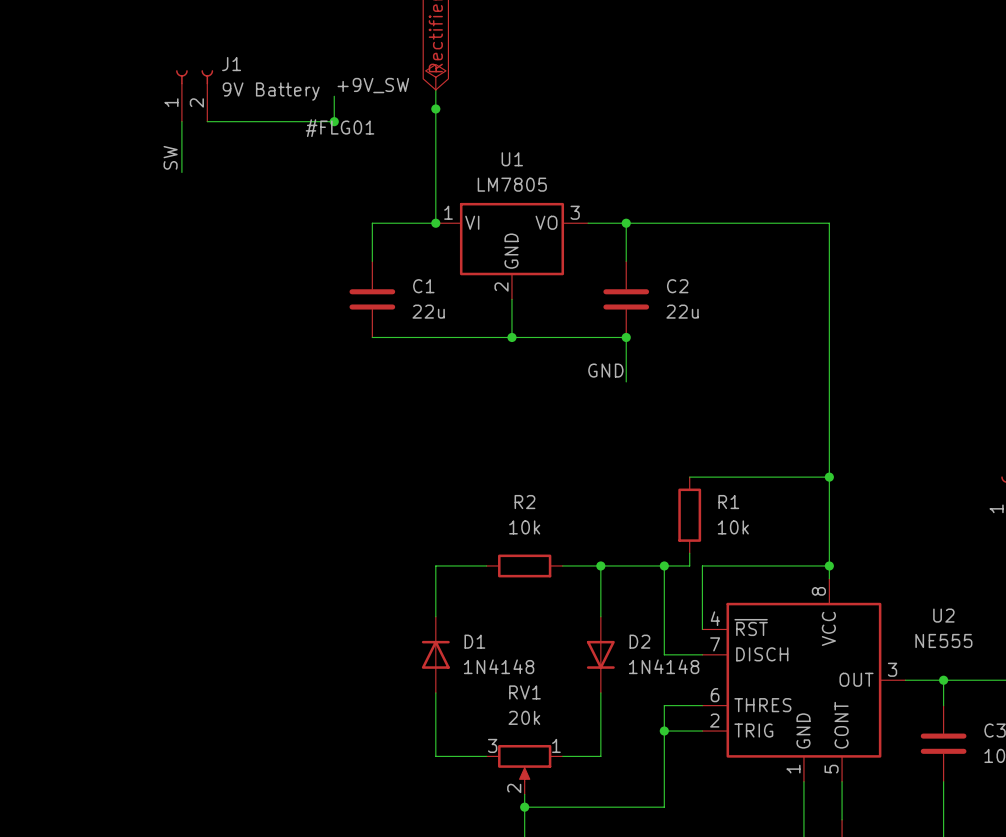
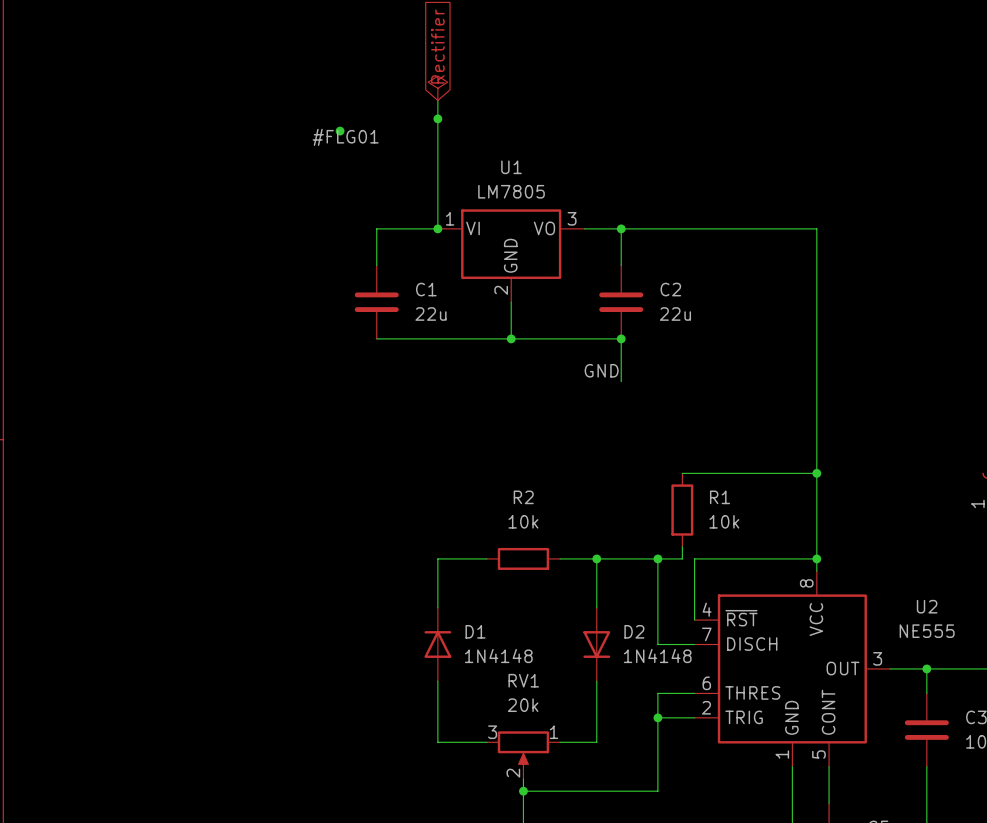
label: +9V_SW (373, 85) -> none
J1: 9V Battery (194, 95) -> none
wire: (334, 96) (334, 121) (207, 121) -> none
wire: (181, 121) (181, 172) -> none
label: SW (170, 157) -> none

